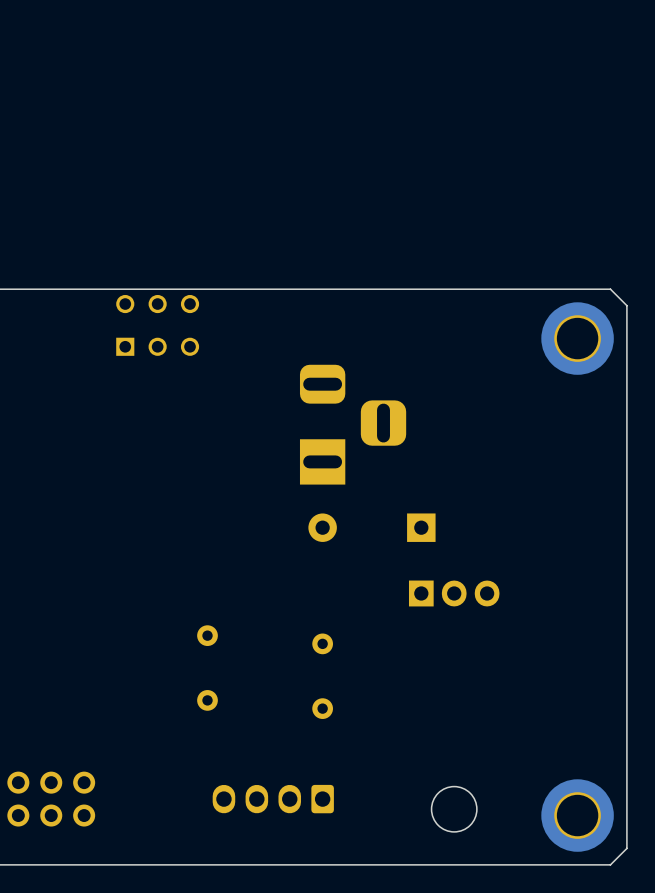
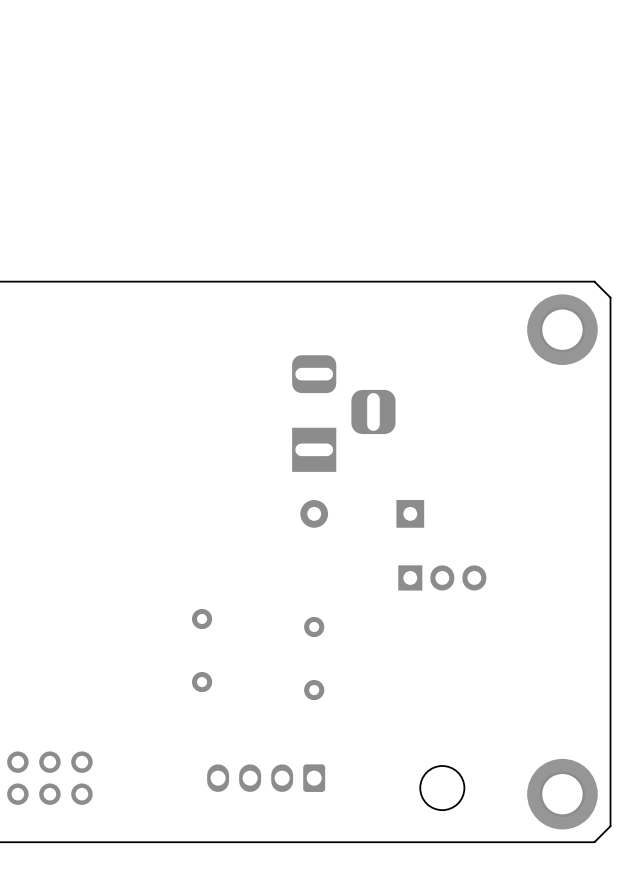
part: (157, 325) -> none

